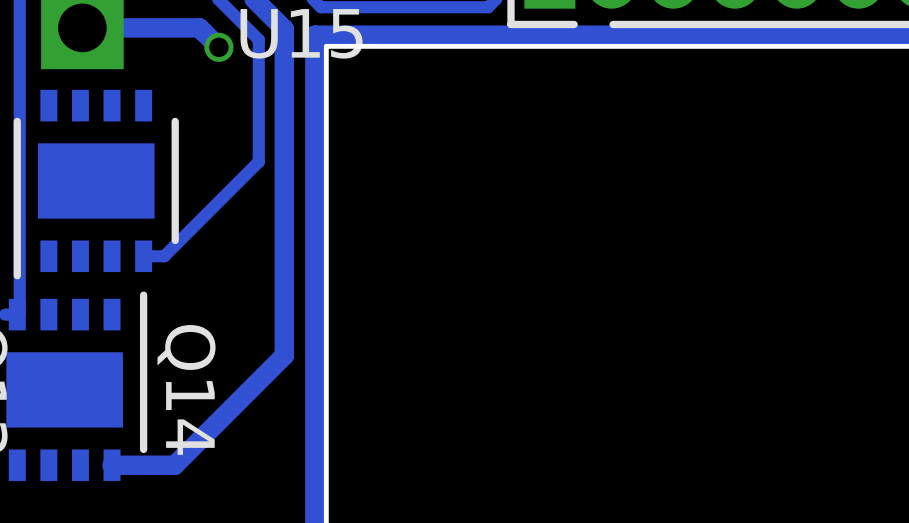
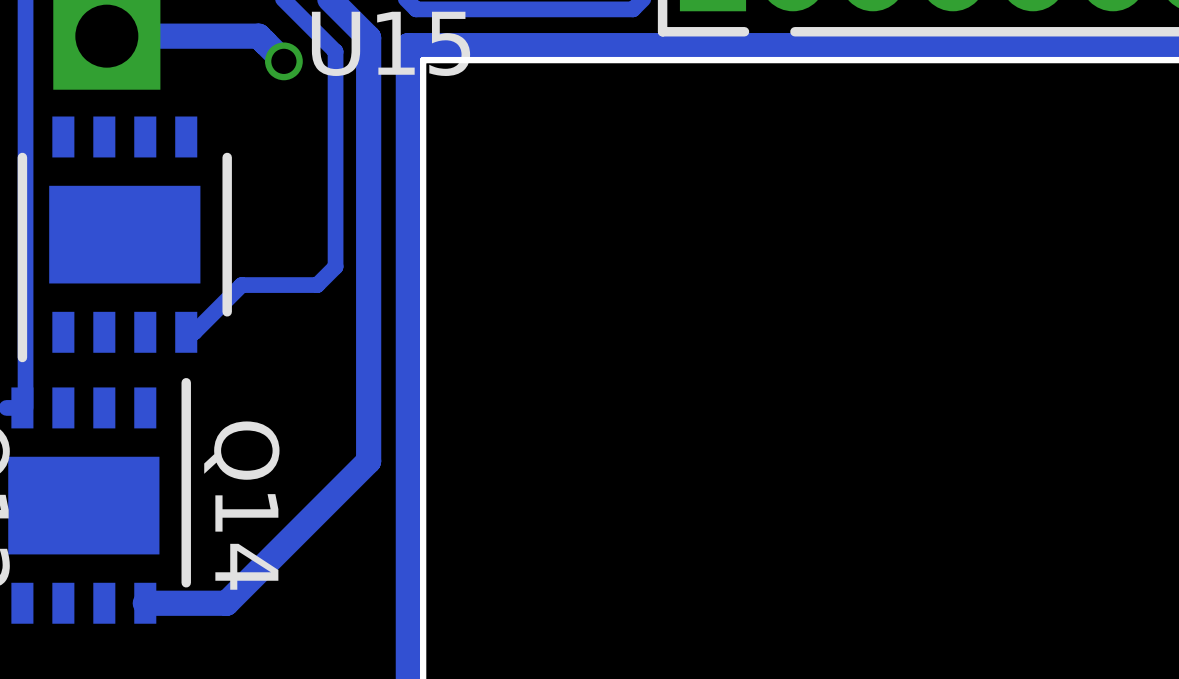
track: (258, 161) (164, 256) (149, 256) -> (335, 209) (335, 266) (317, 285) (241, 285) (194, 332)

